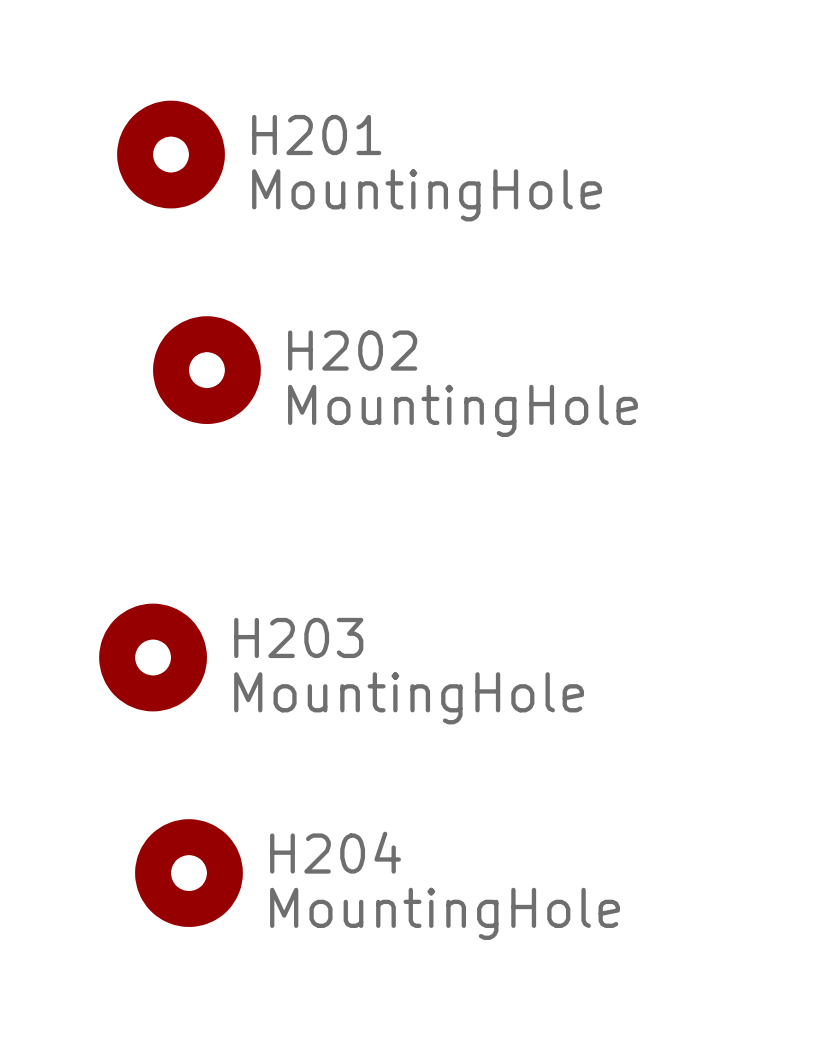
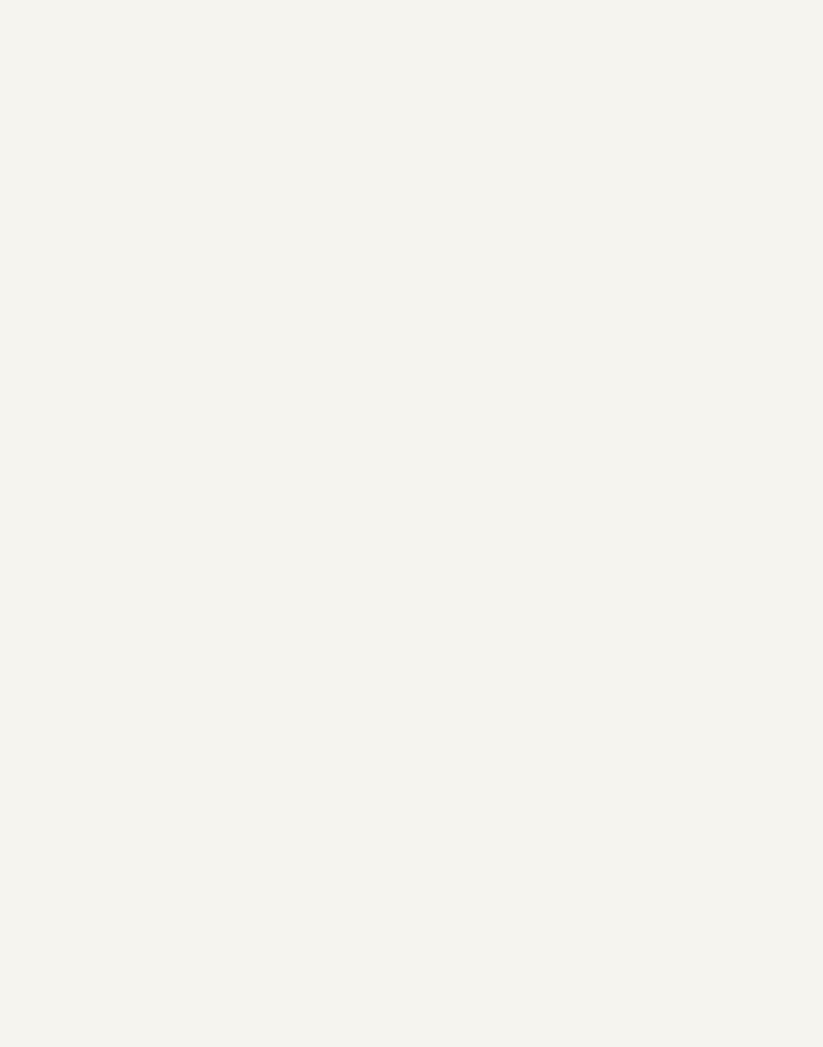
H201: MountingHole (171, 154) -> none
H202: MountingHole (206, 370) -> none
H203: MountingHole (153, 657) -> none
H204: MountingHole (188, 873) -> none

